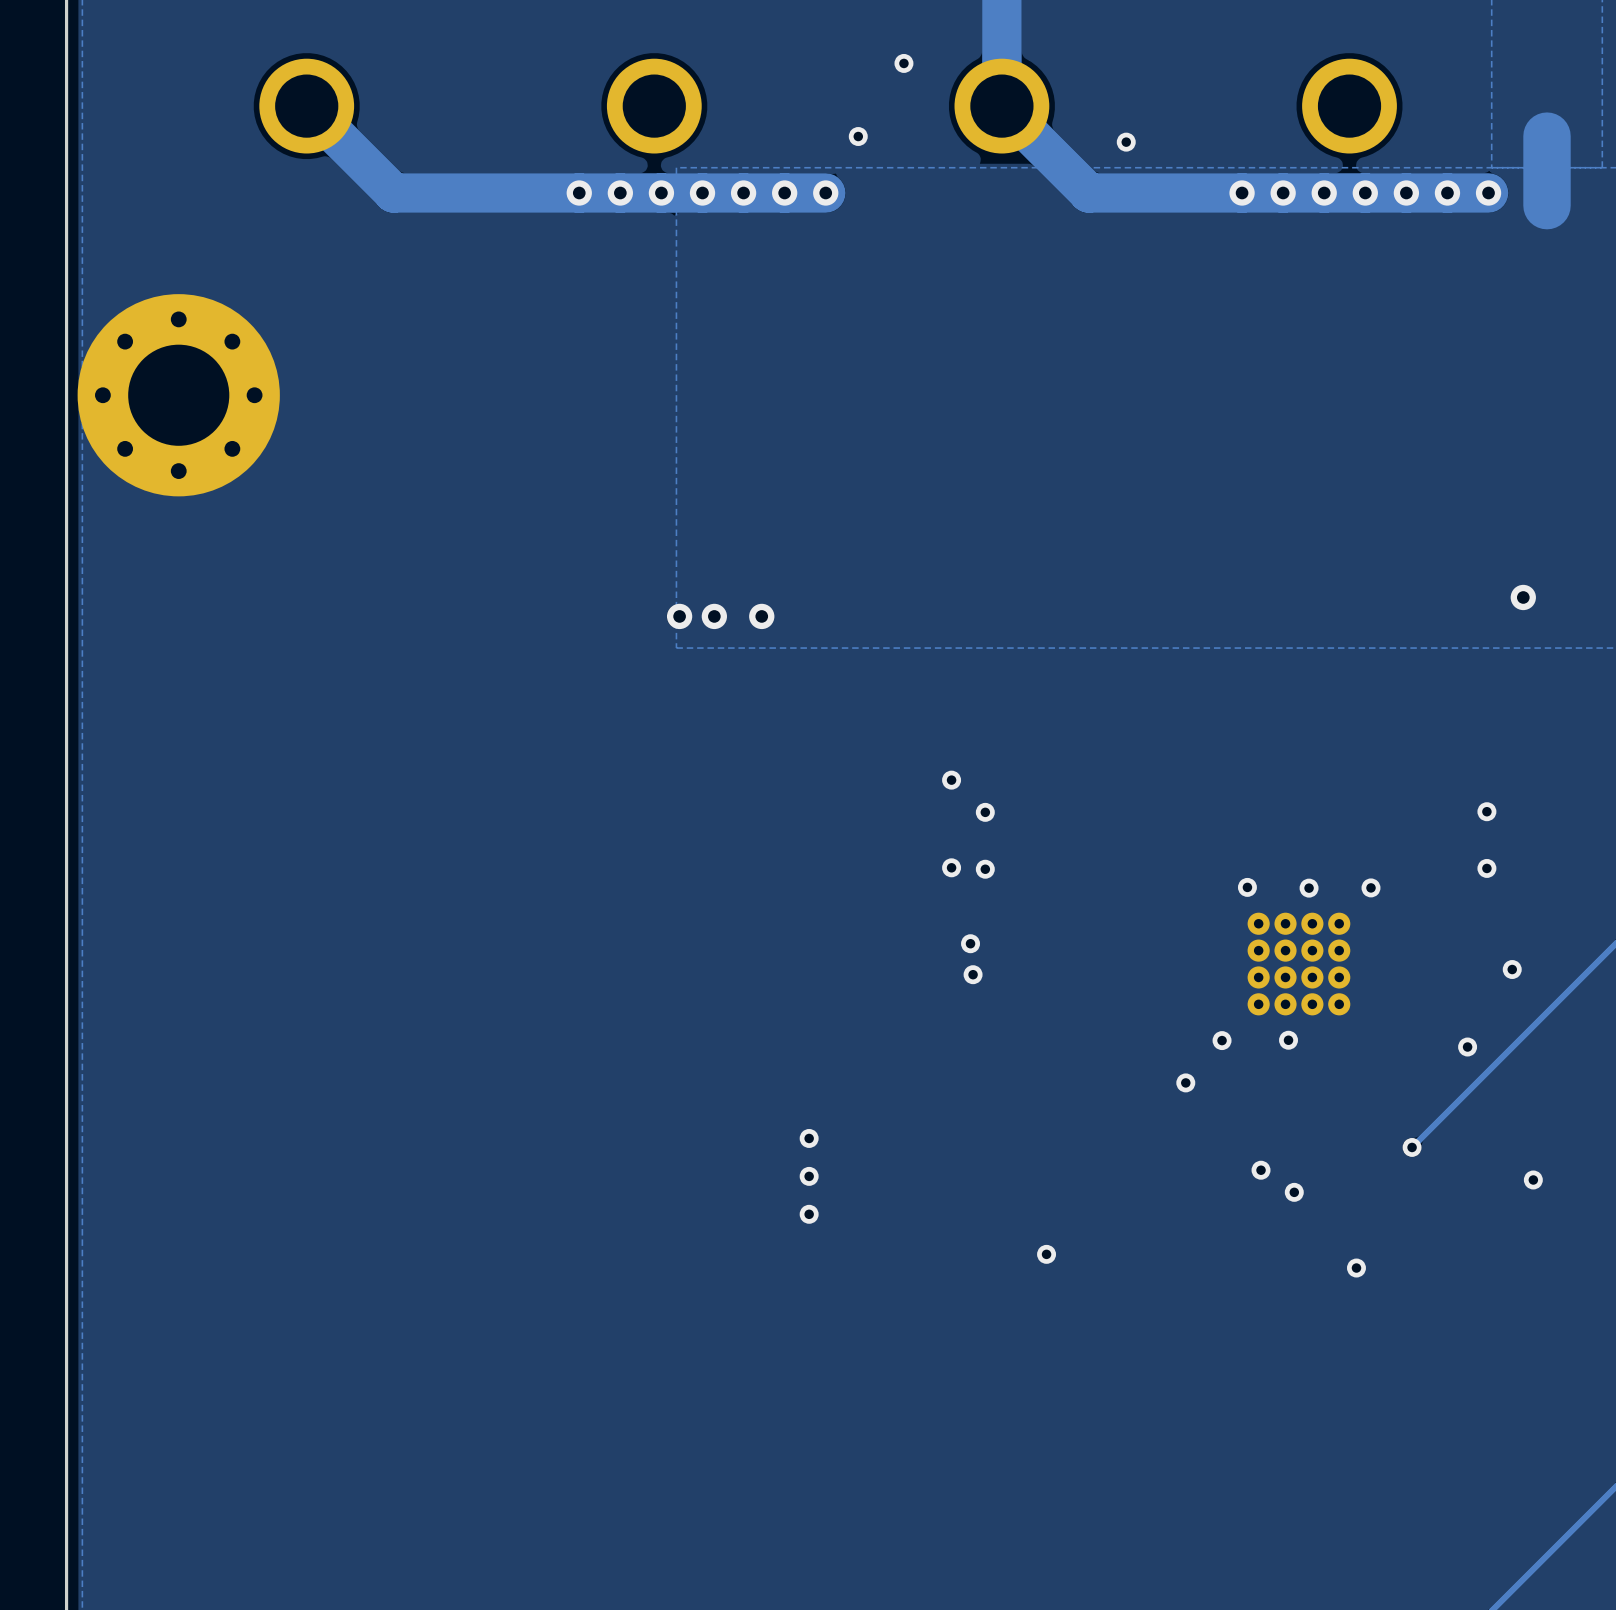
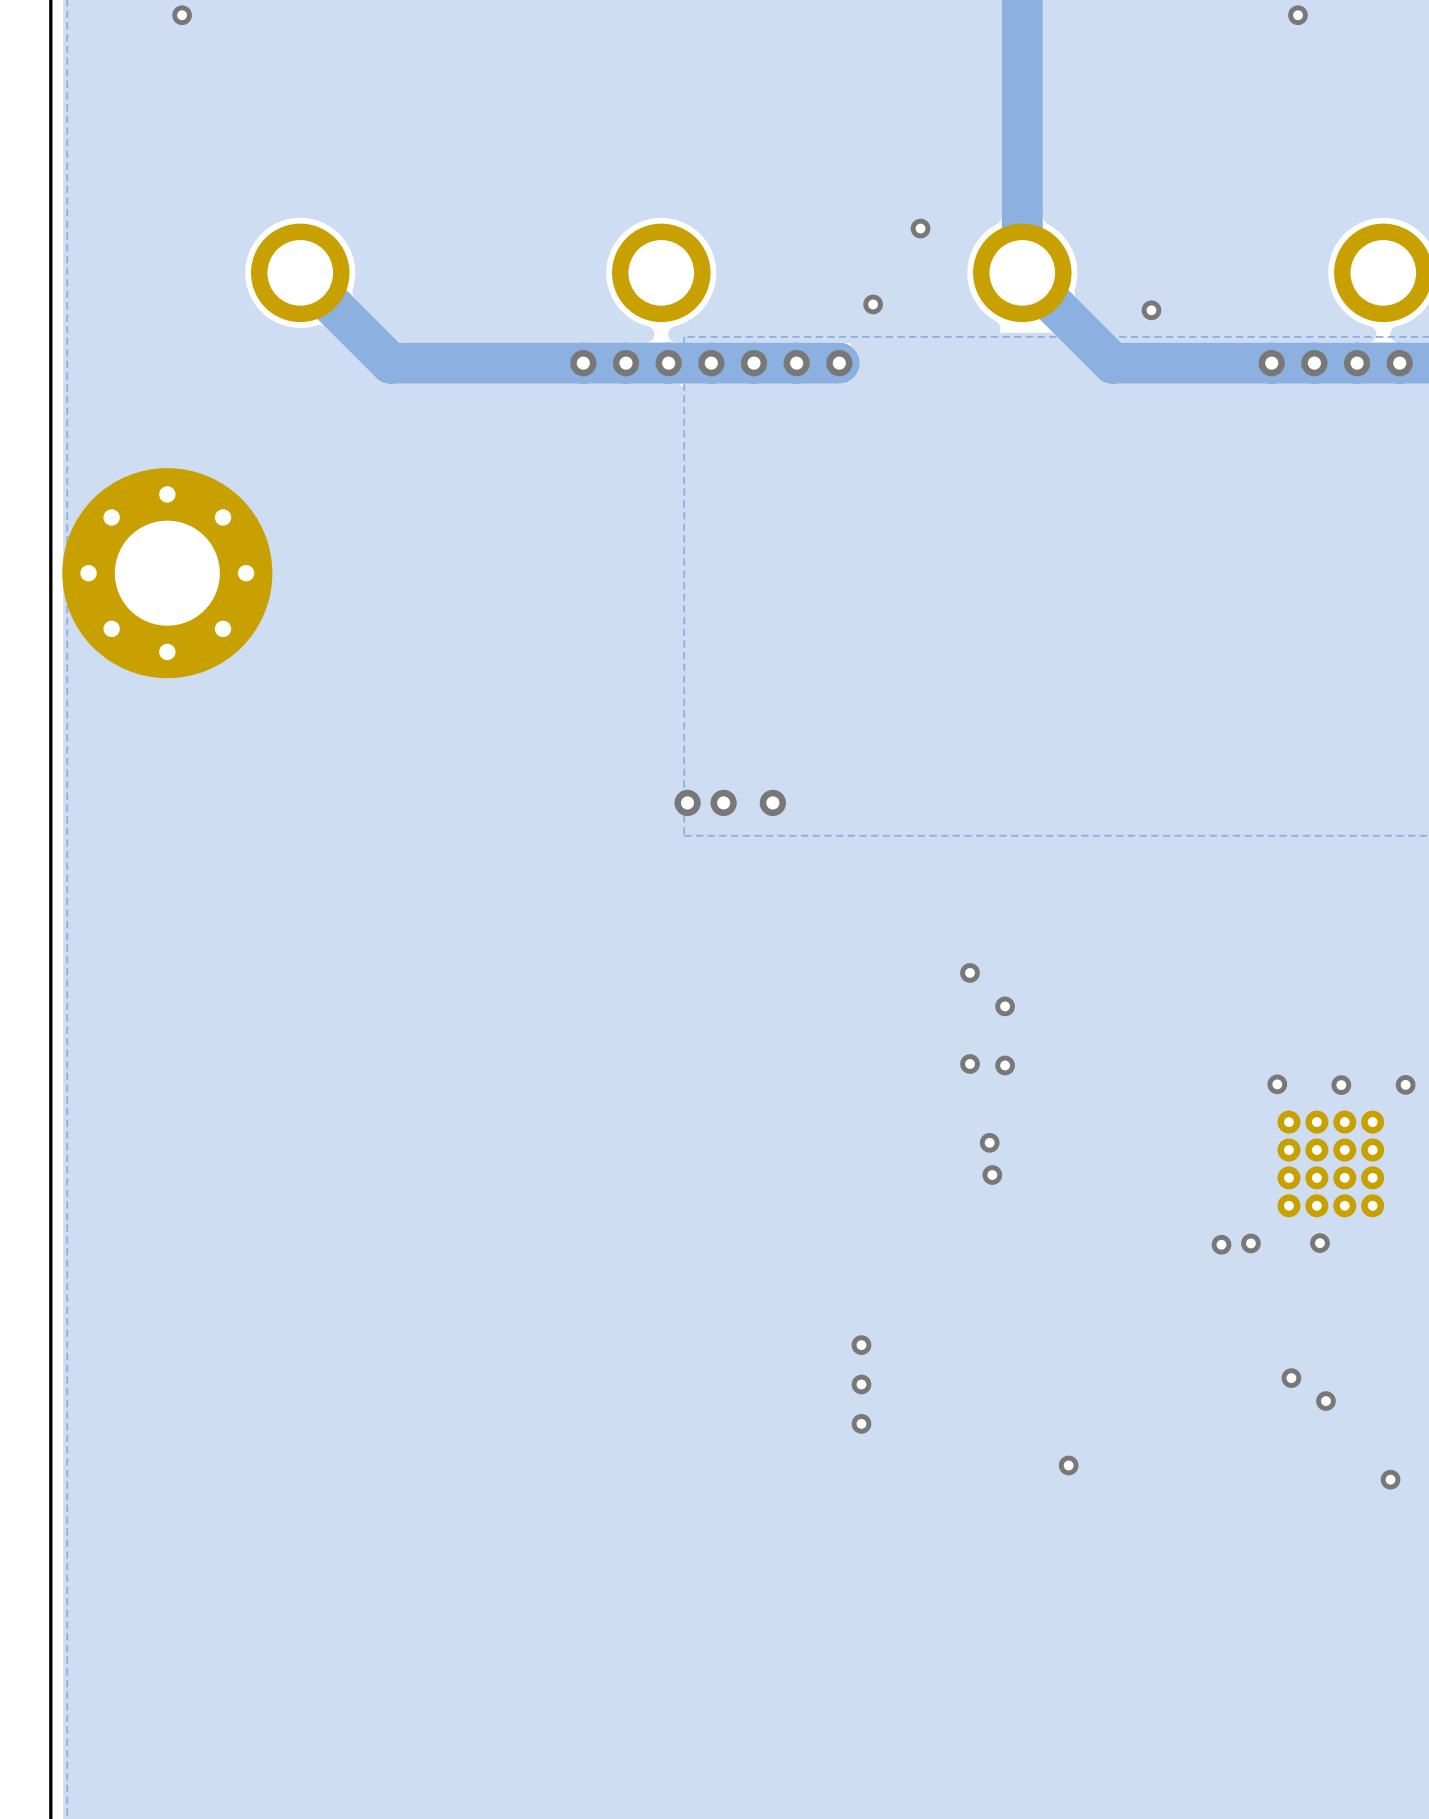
via position: (1185, 1082) -> (1221, 1244)
via: (809, 1138) -> none
via: none -> (861, 1345)
via: (809, 1176) -> none
via: none -> (861, 1384)
via: (809, 1214) -> none
via: none -> (861, 1423)

